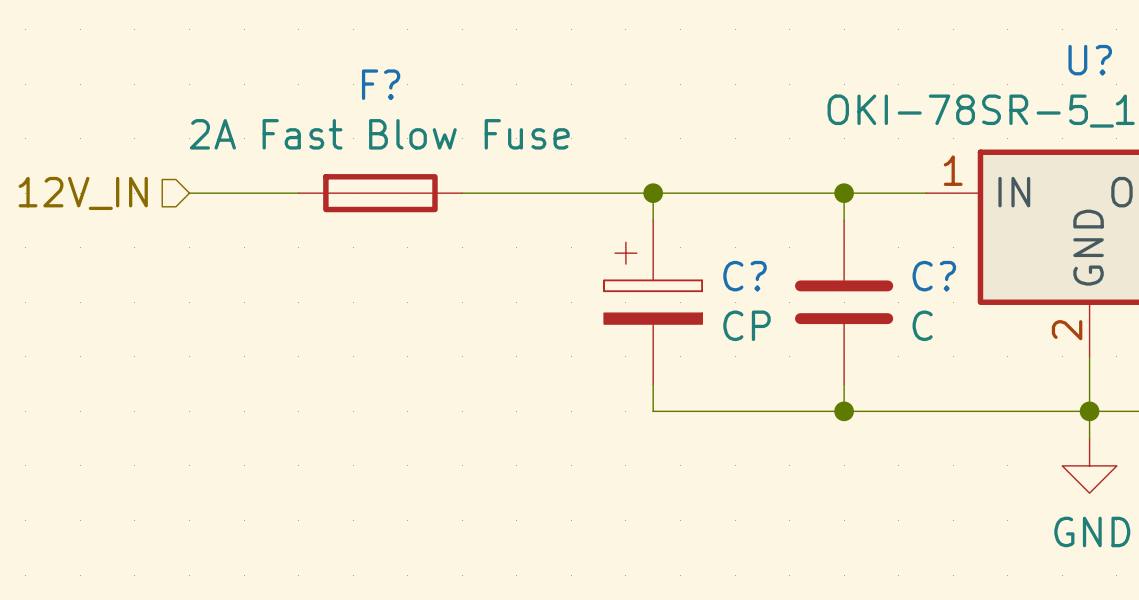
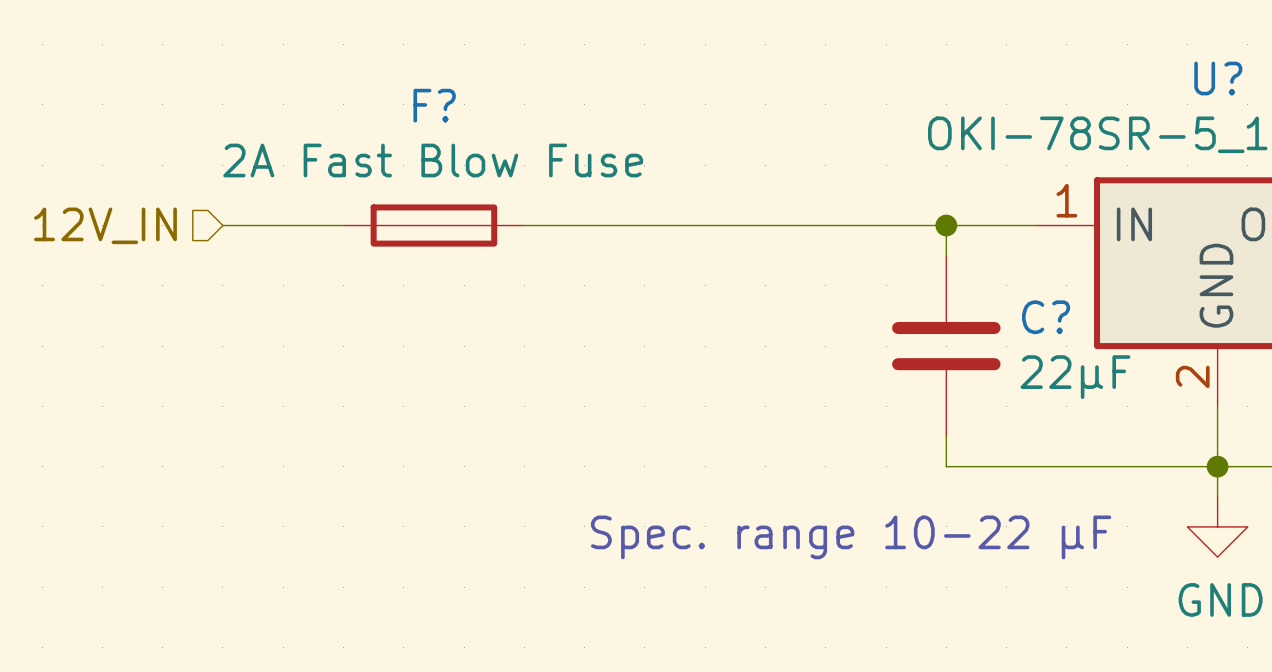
wire: (653, 193) (653, 220) -> none
junction: (653, 193) -> none
C?: CP (653, 302) -> none
C? value: C (922, 325) -> 22µF (1075, 377)
wire: (653, 384) (653, 411) (844, 411) -> none
junction: (844, 411) -> none
text: none -> Spec. range 10-22 µF (851, 537)

